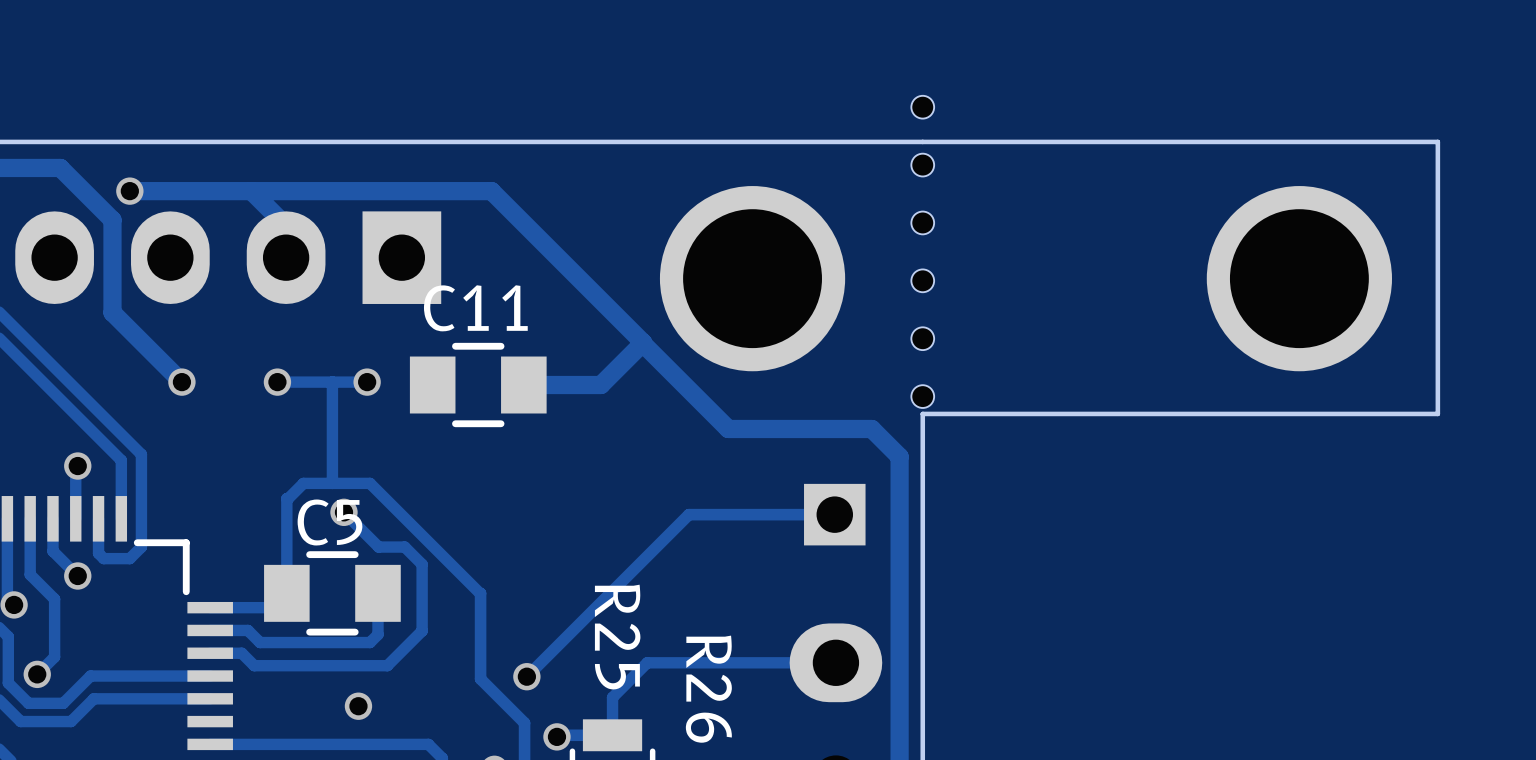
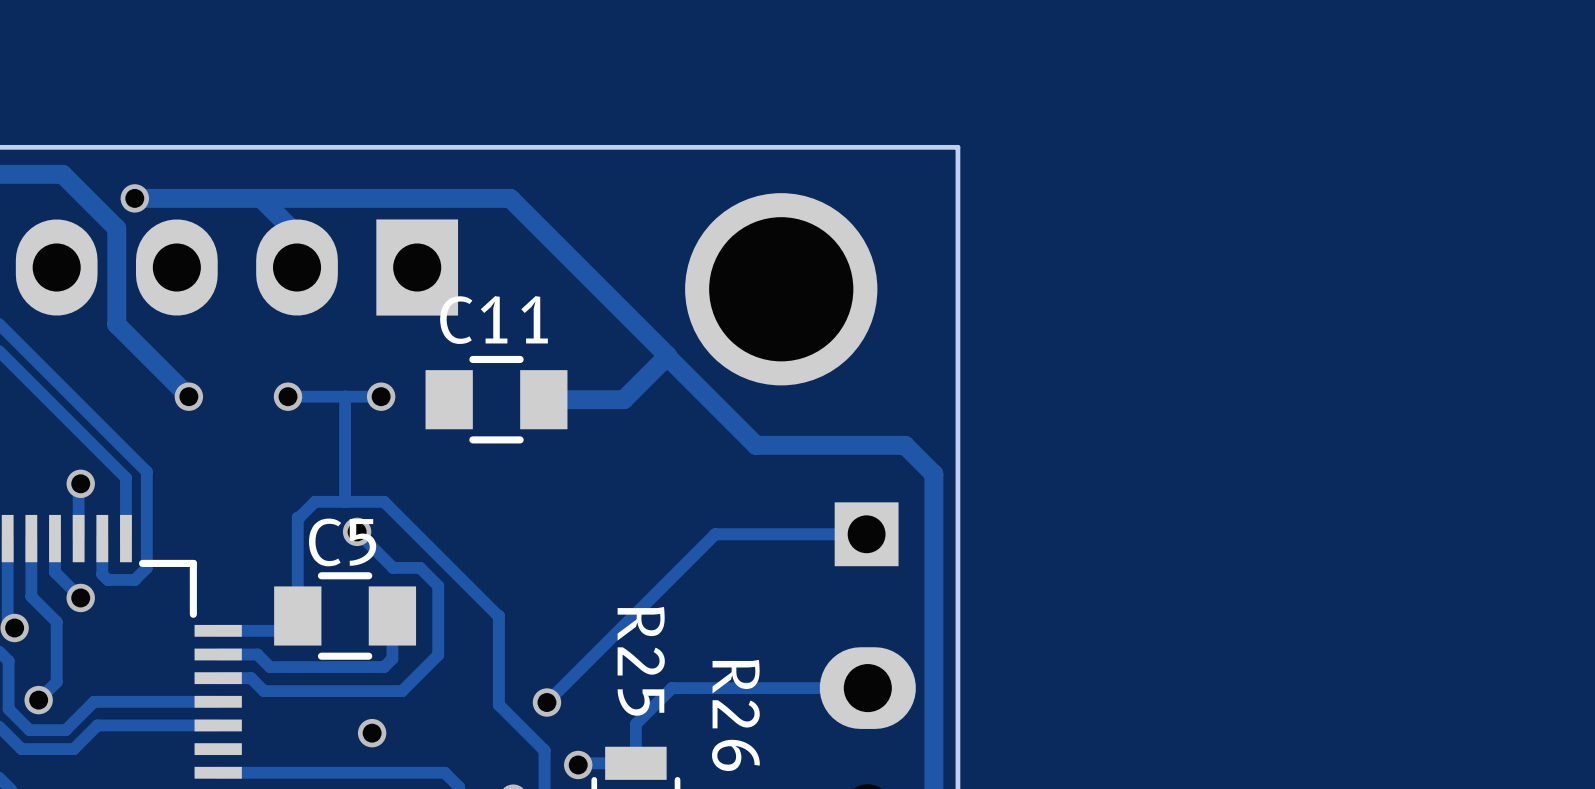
board edge: (922, 141) (1437, 141) (1437, 413) (922, 413) -> (957, 147) (957, 429)
part: (922, 165) -> none
part: (1299, 278) -> none
part: (922, 338) -> none

